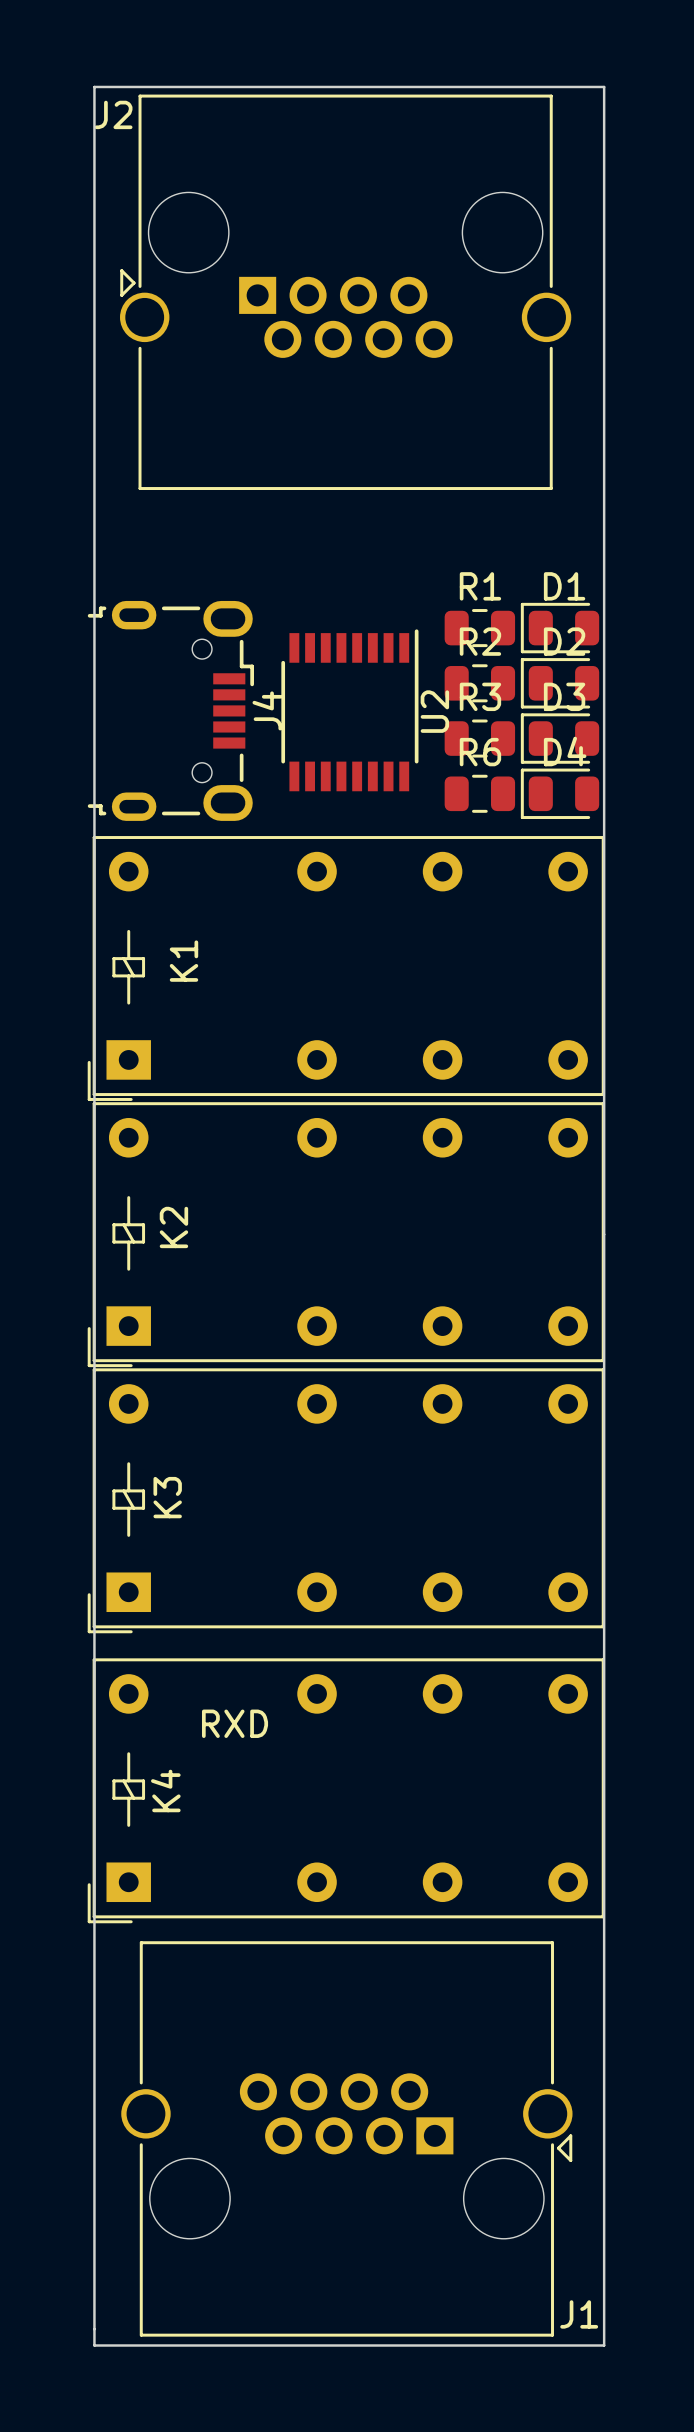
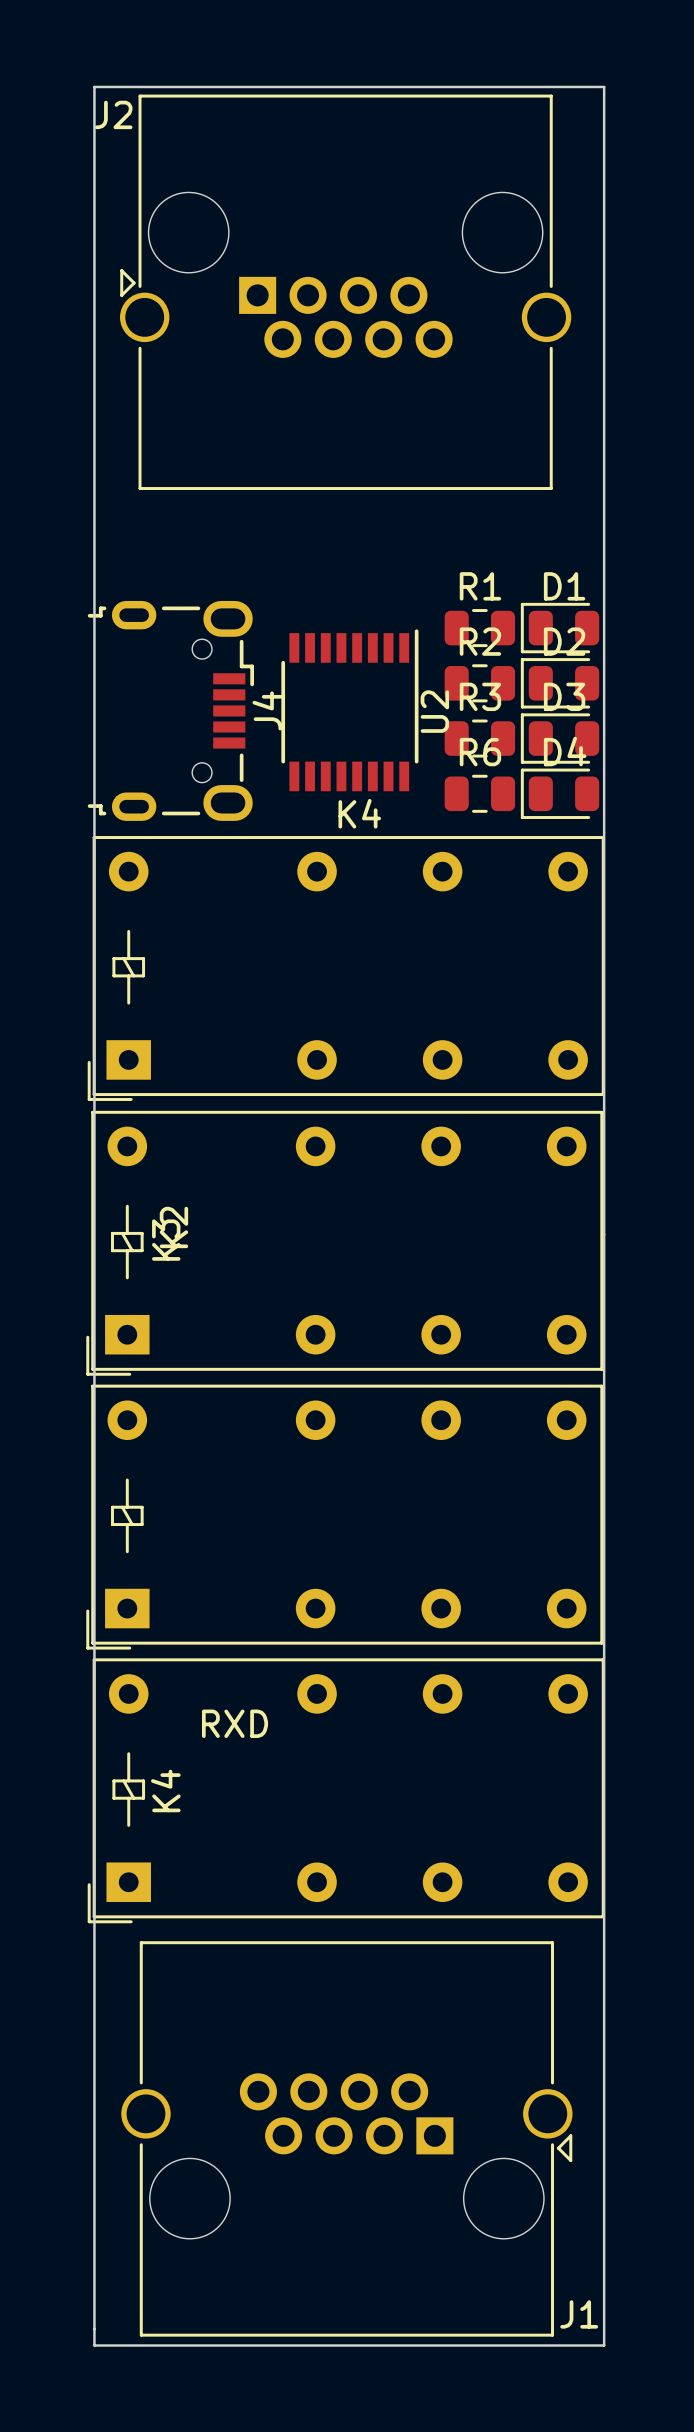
K1 name: K1 (183, 961) -> K4 (359, 813)
K2 position: (346, 1234) -> (344, 1517)
K3 position: (346, 1500) -> (344, 1243)

